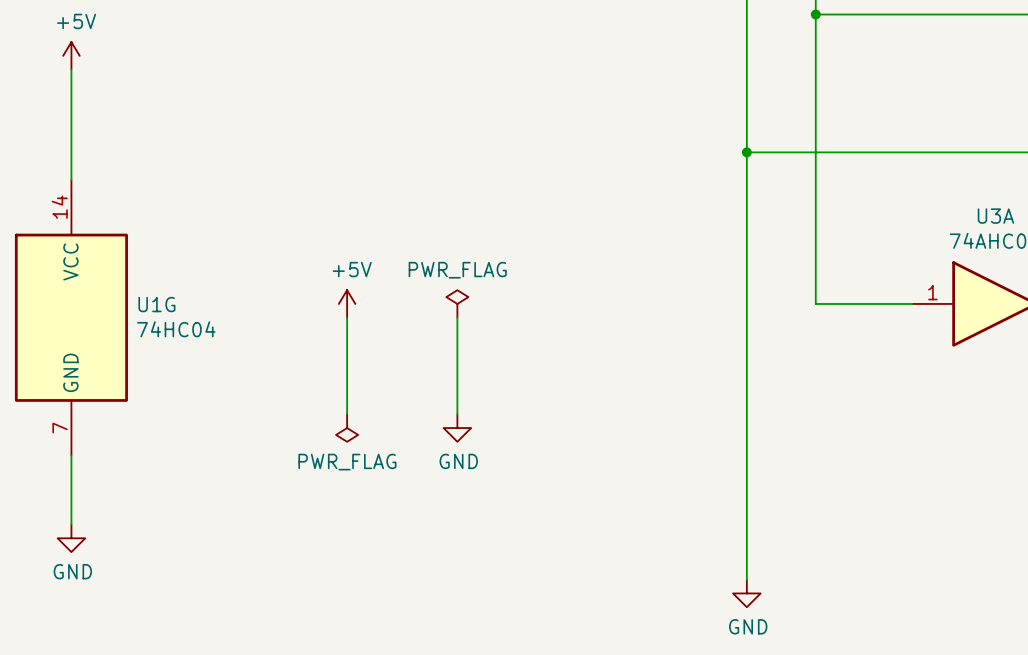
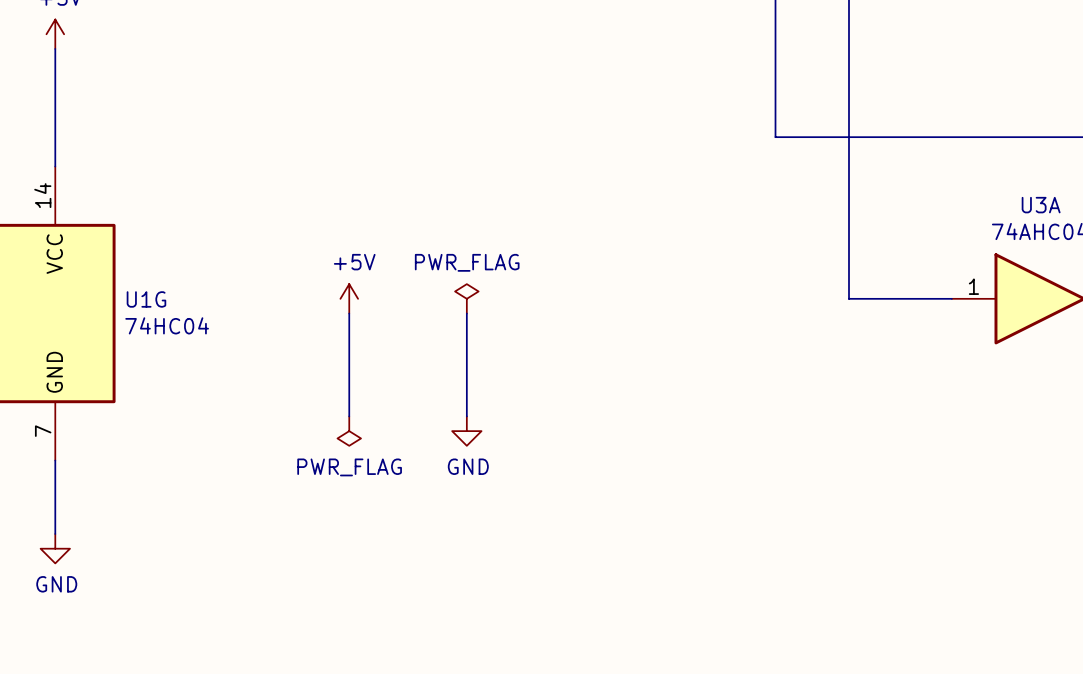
wire: (746, 152) (746, 579) -> none
junction: (746, 152) -> none
power symbol: GND (746, 593) -> none

